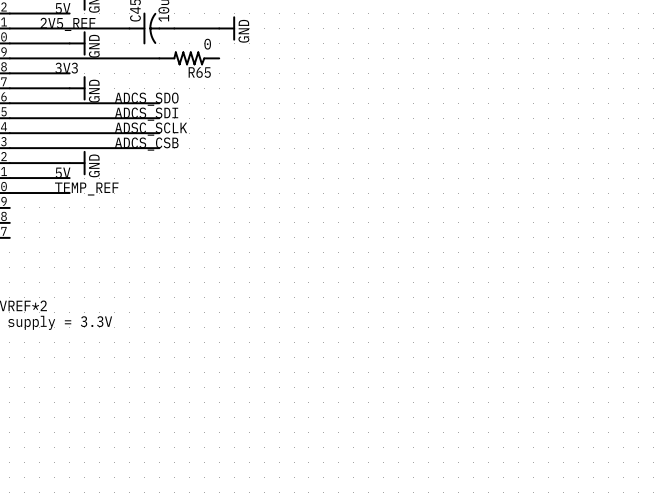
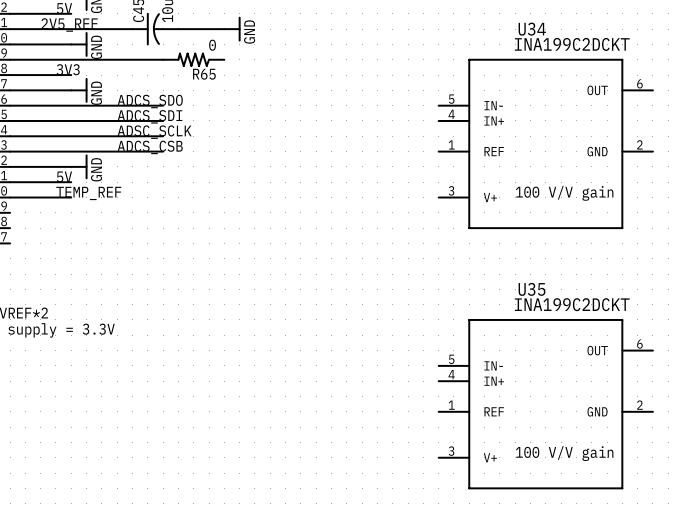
U34: none -> INA199C2DCKT (545, 143)
text: none -> 100 V/V gain (564, 193)
U35: none -> INA199C2DCKT (545, 404)
text: none -> 100 V/V gain (564, 453)

